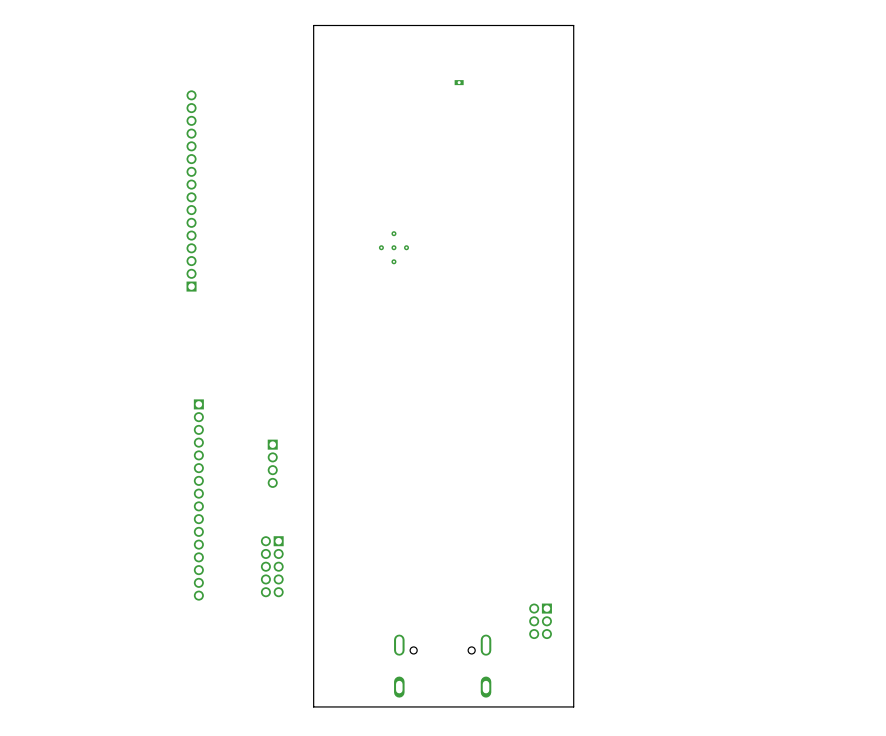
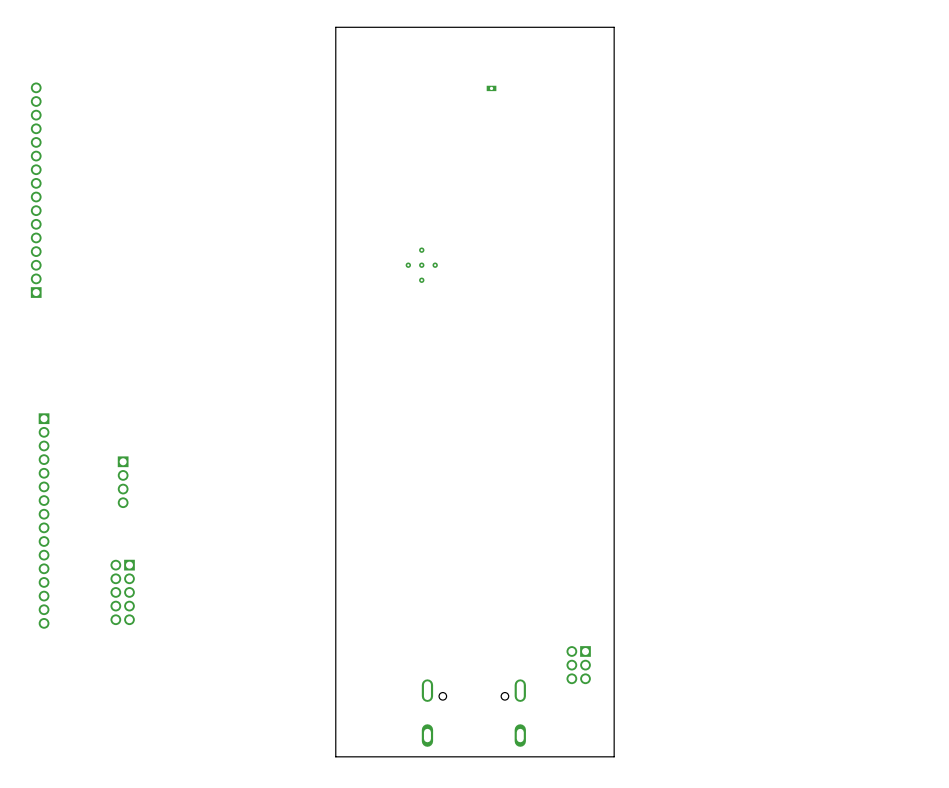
part position: (191, 190) -> (36, 190)
part position: (272, 463) -> (123, 482)
part position: (198, 500) -> (44, 521)
part position: (272, 566) -> (122, 592)

